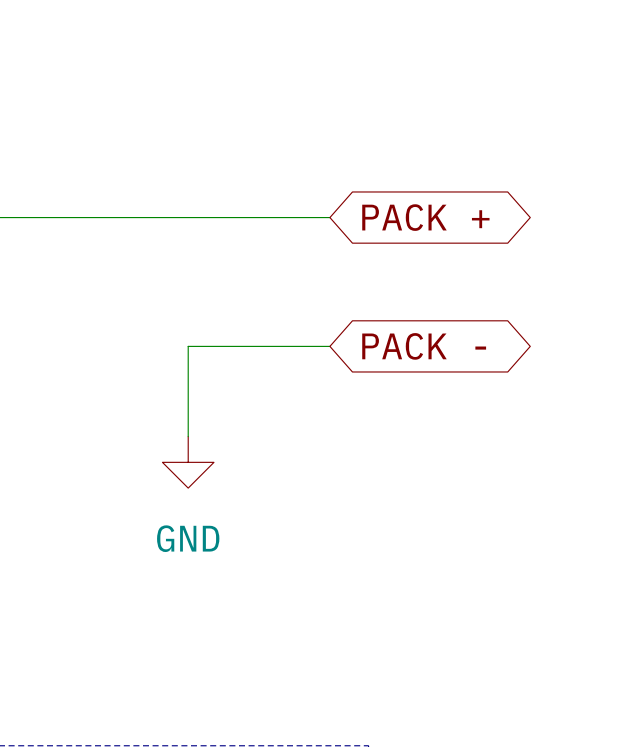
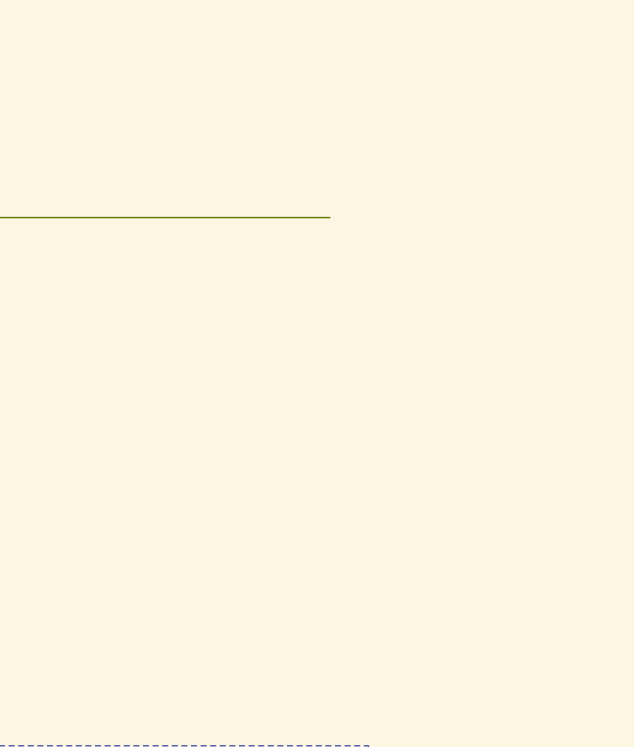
global label: PACK + (425, 217) -> none
wire: (329, 346) (188, 346) (188, 436) -> none
global label: PACK - (424, 346) -> none
power symbol: GND (188, 462) -> none

